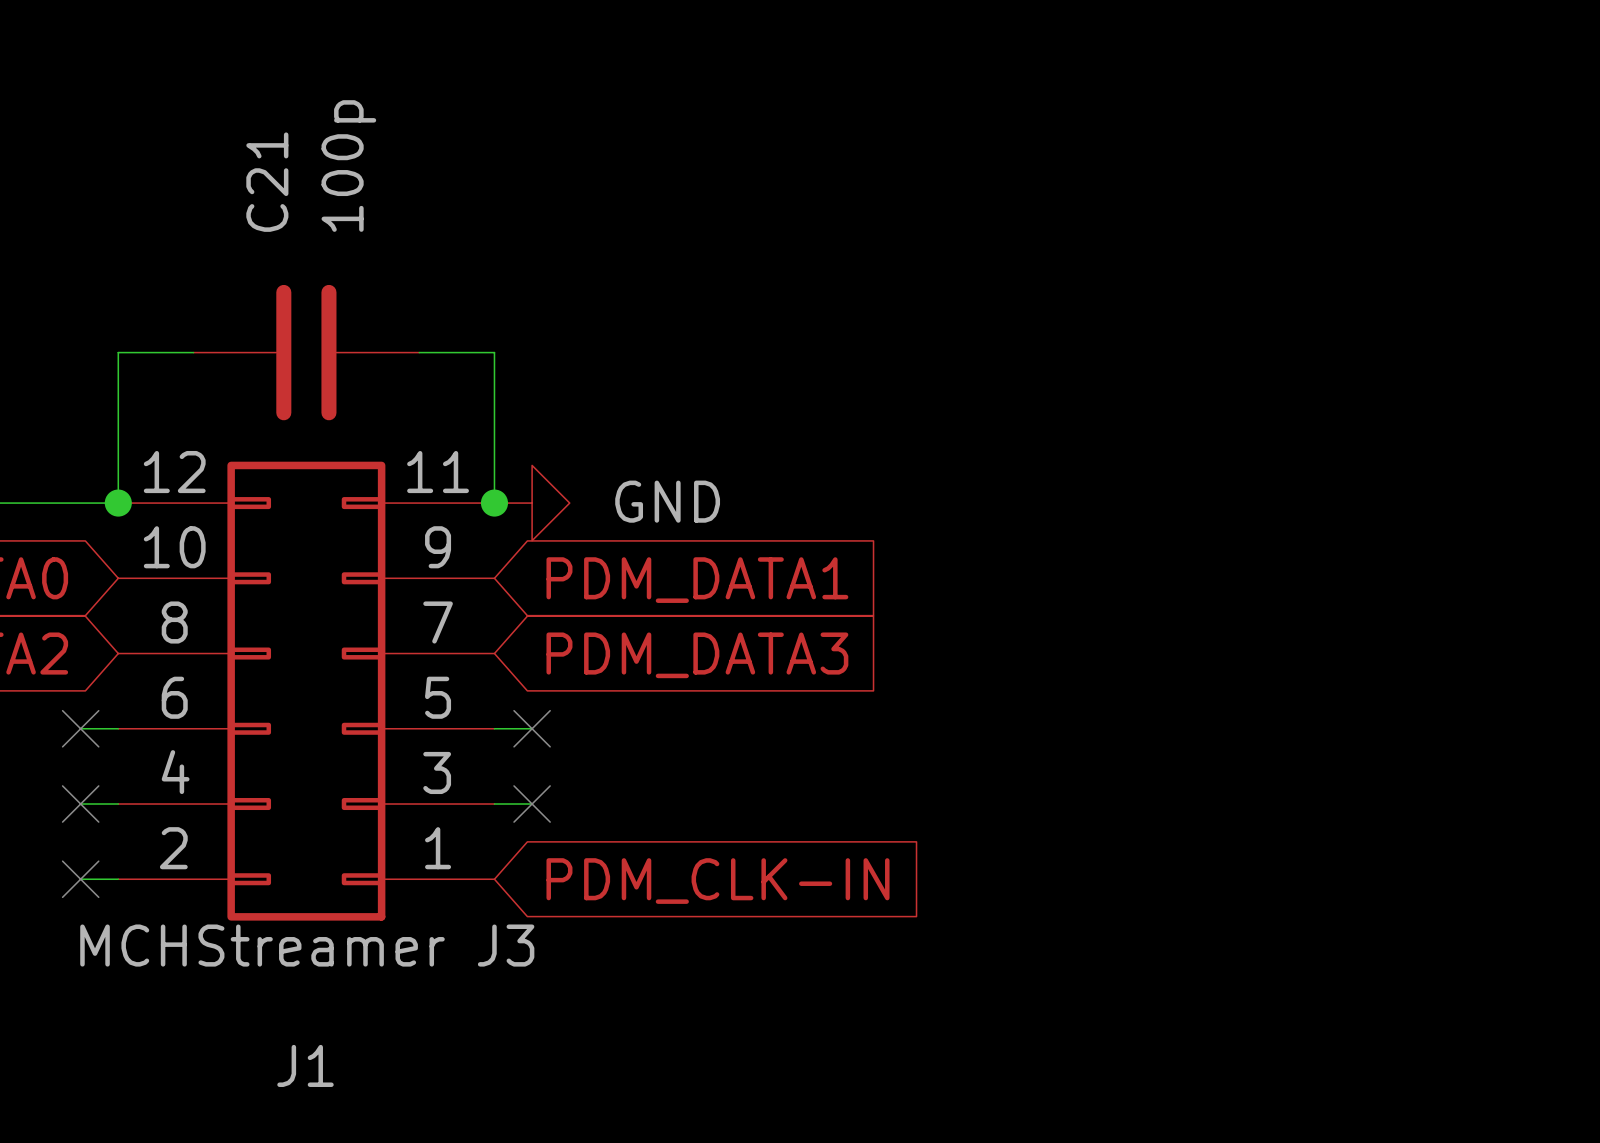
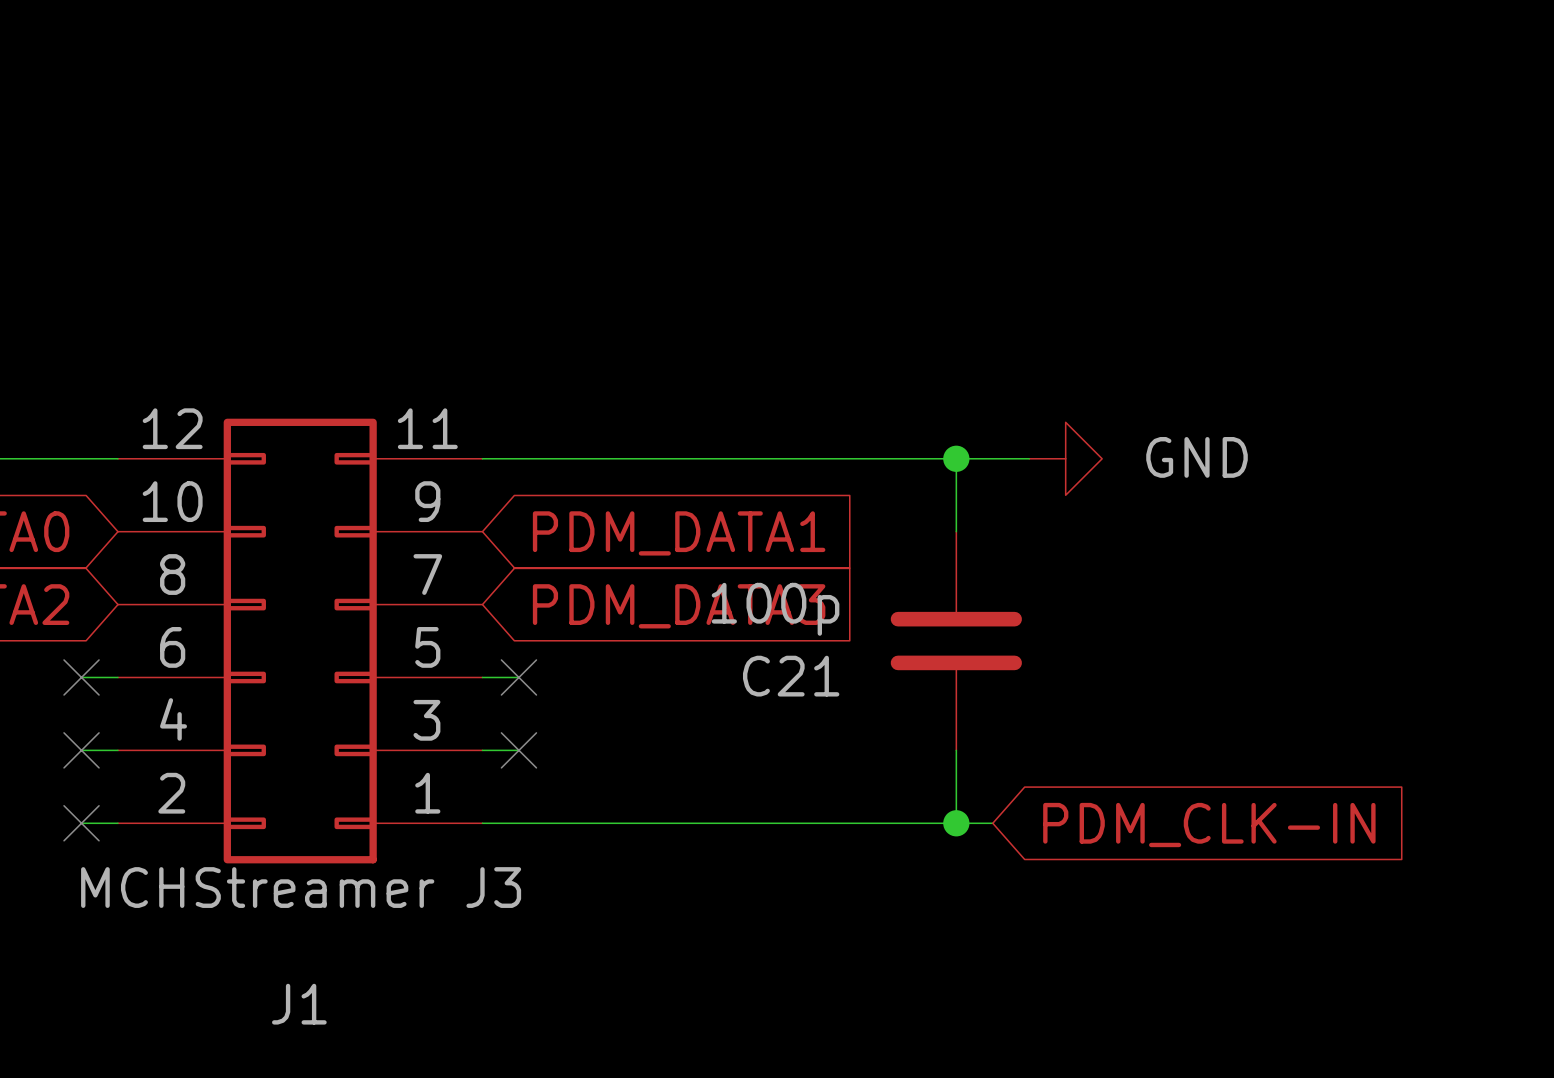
C21 value position: 100p (348, 166) -> 100p (775, 609)
C21 name position: C21 (267, 182) -> C21 (791, 676)
wire: (193, 352) (118, 352) (118, 503) -> none
C21 rotation: 0° (306, 352) -> 90° clockwise (956, 641)
C21 position: (306, 352) -> (956, 641)
wire: (419, 352) (494, 352) (494, 503) -> (1029, 458) (482, 458)
junction: (118, 503) -> none
junction: (494, 503) -> none
power symbol position: GND (532, 503) -> GND (1065, 458)
wire: none -> (956, 458) (956, 531)
junction: none -> (956, 458)
wire: none -> (956, 750) (956, 823)
wire: none -> (482, 823) (992, 823)
junction: none -> (956, 823)
global label position: PDM_CLK-IN (718, 881) -> PDM_CLK-IN (1209, 825)

